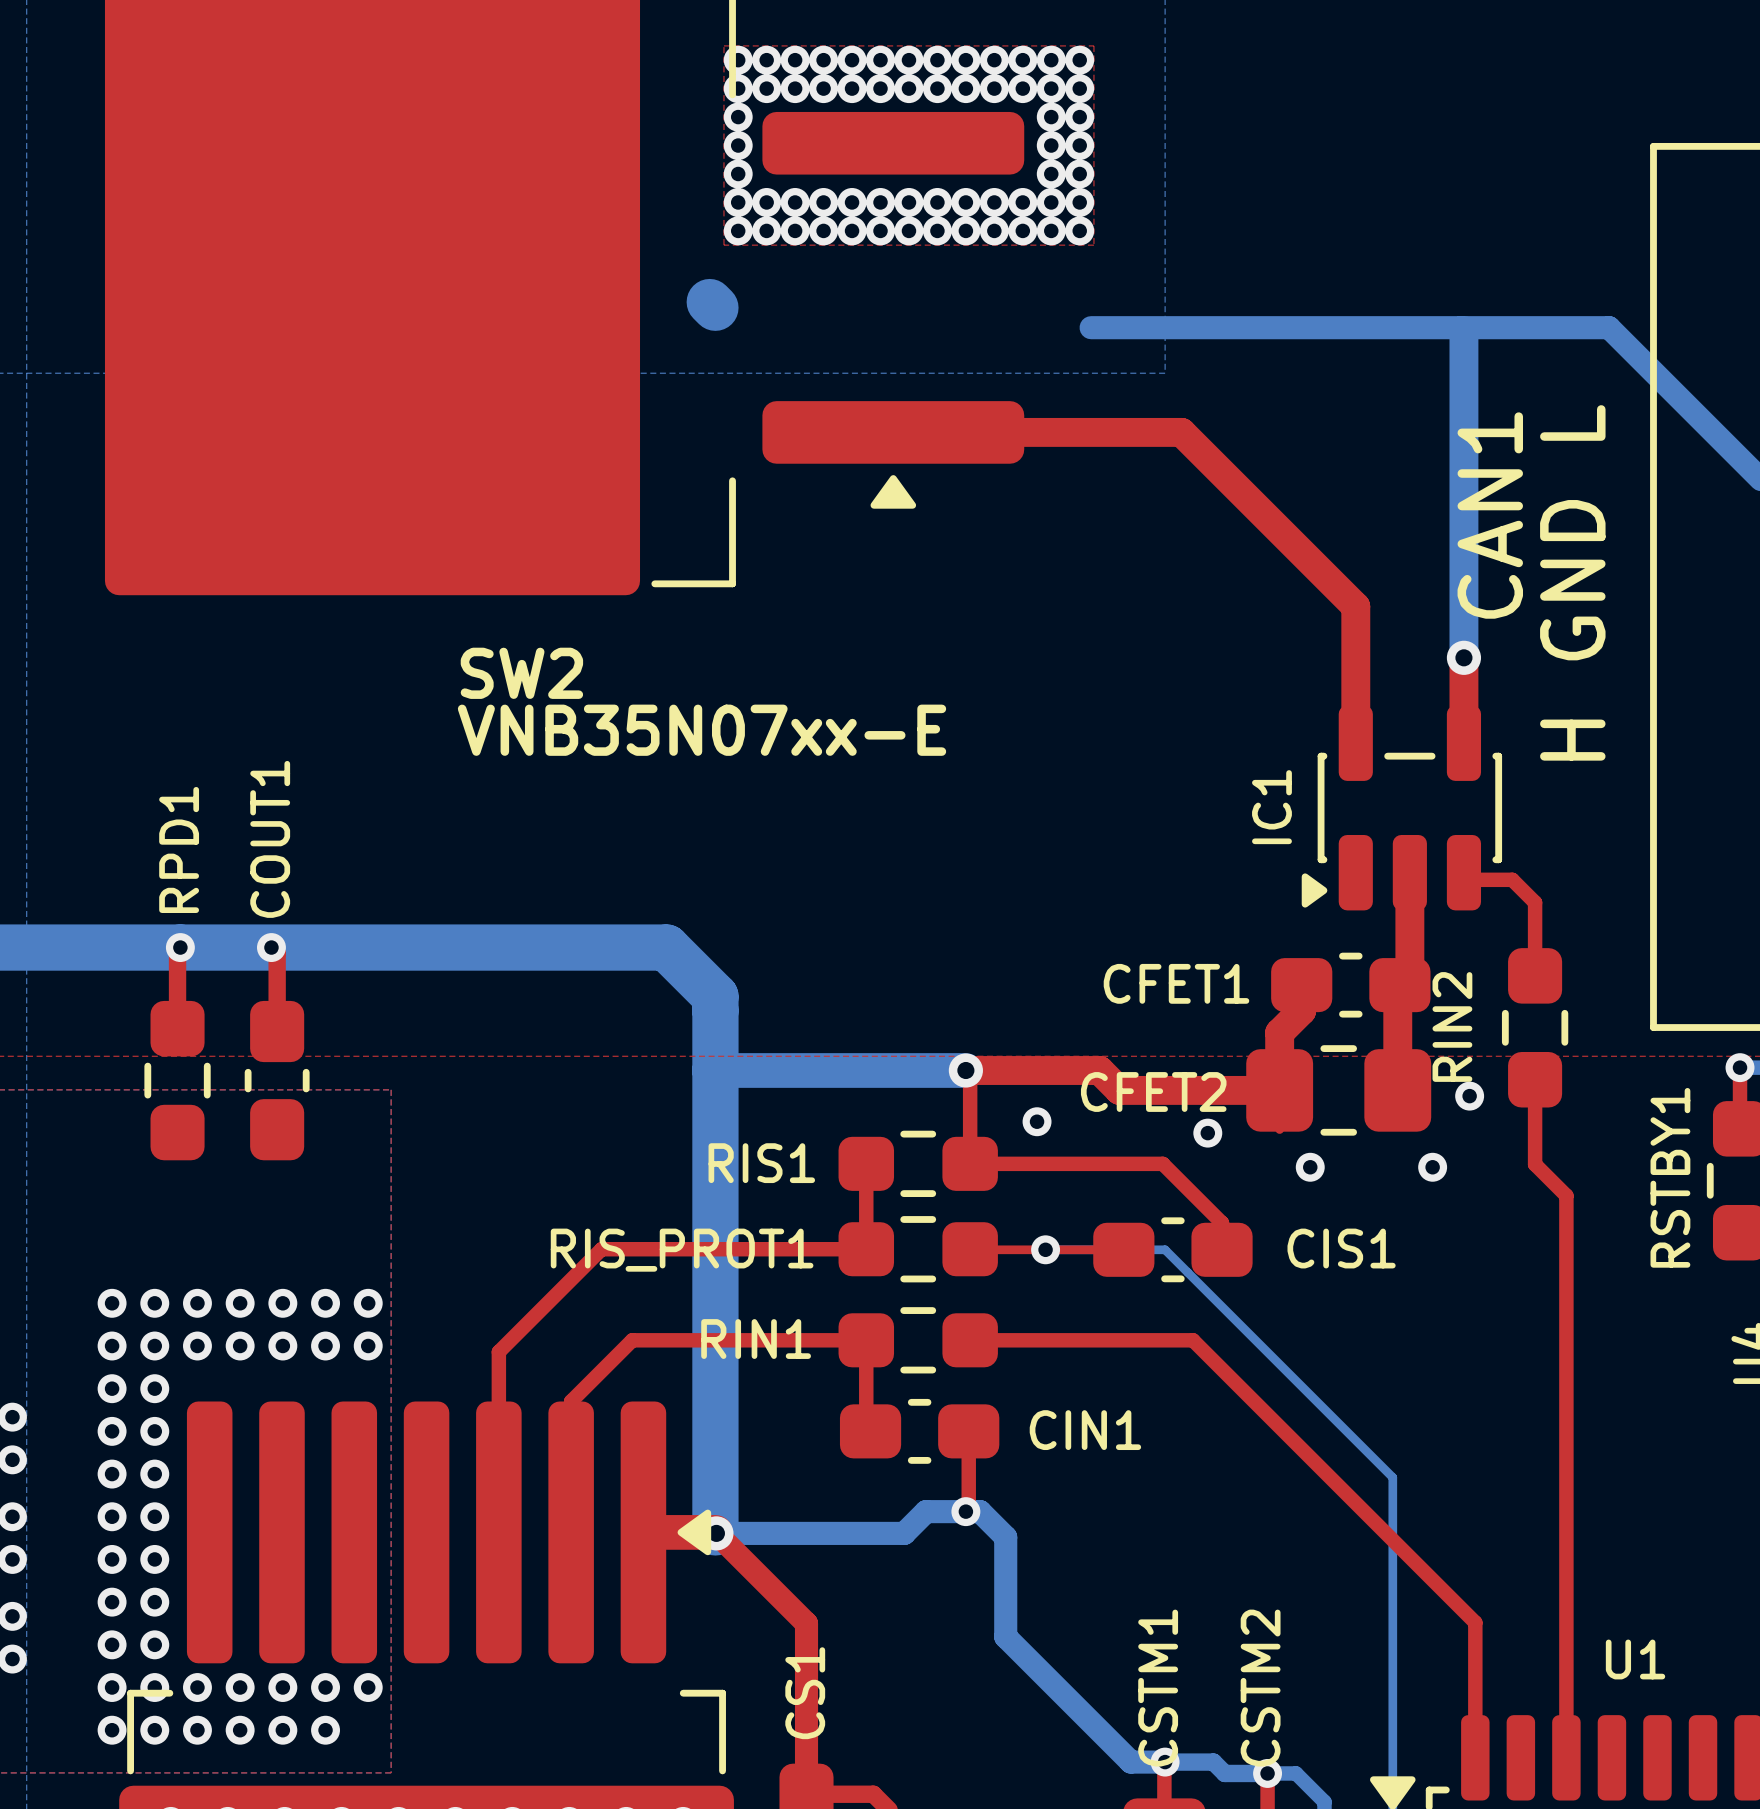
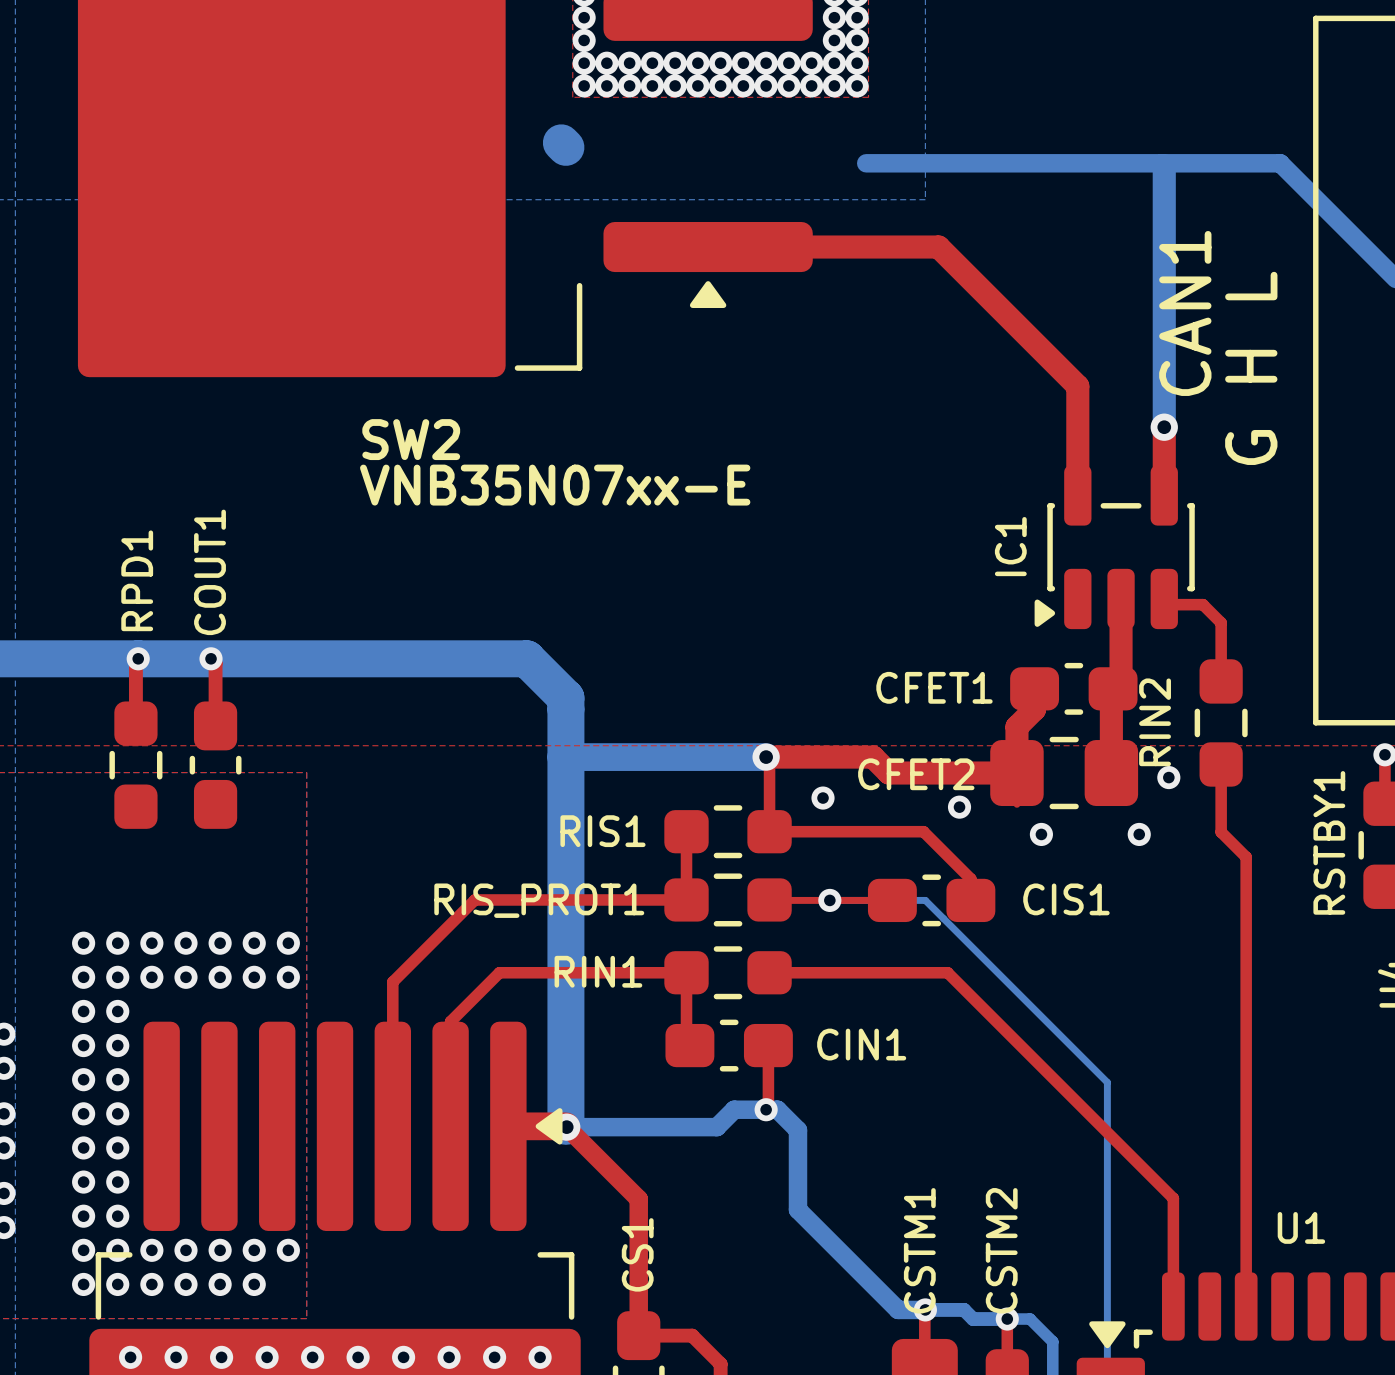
CAN1 value: H GND L (1572, 582) -> G H L (1251, 368)

